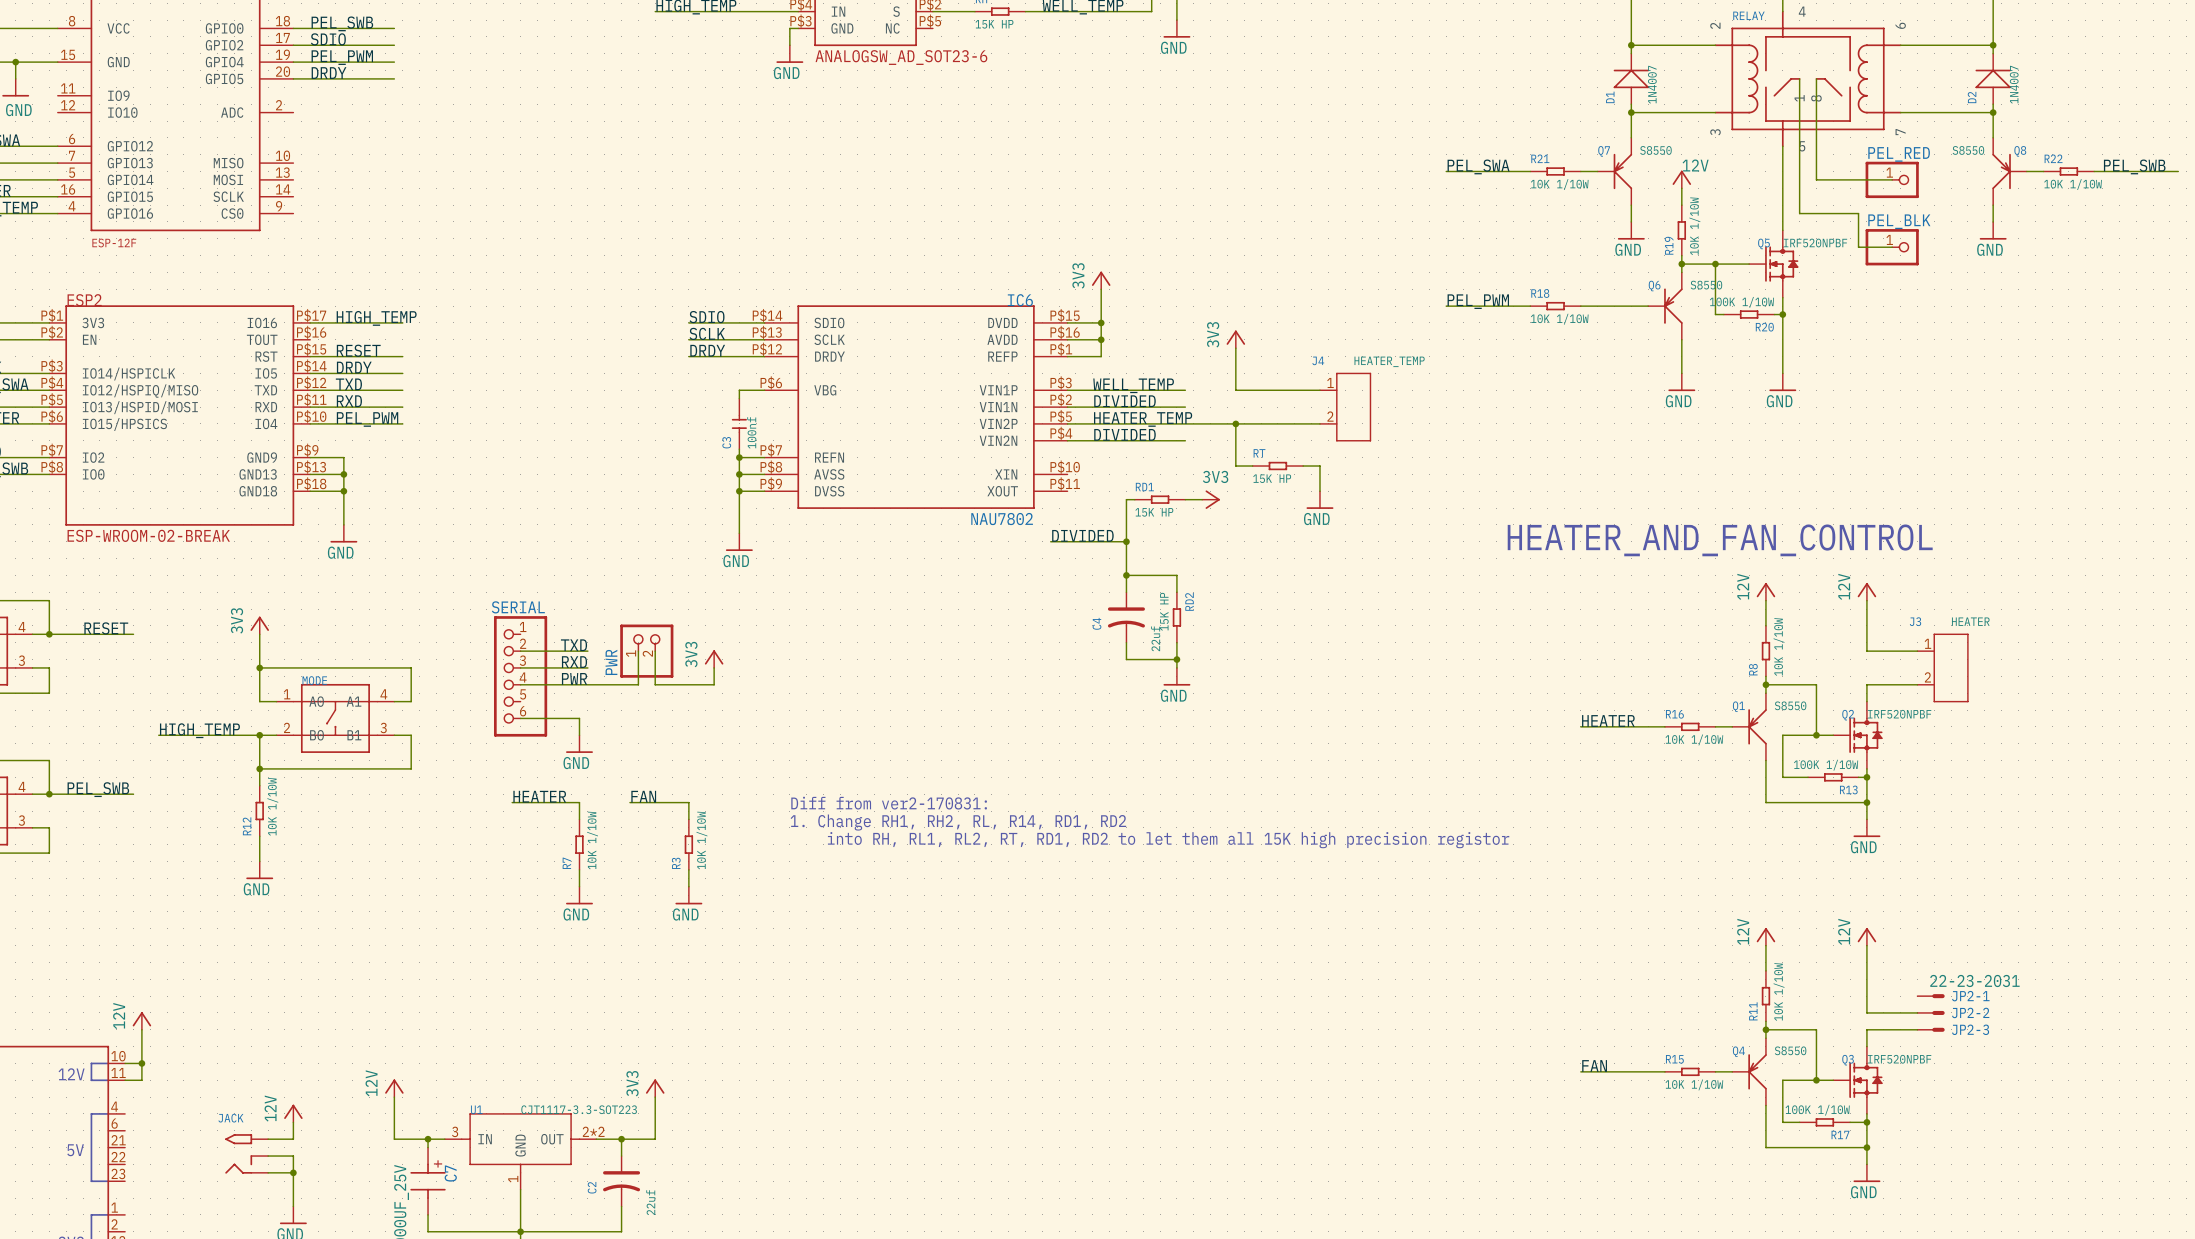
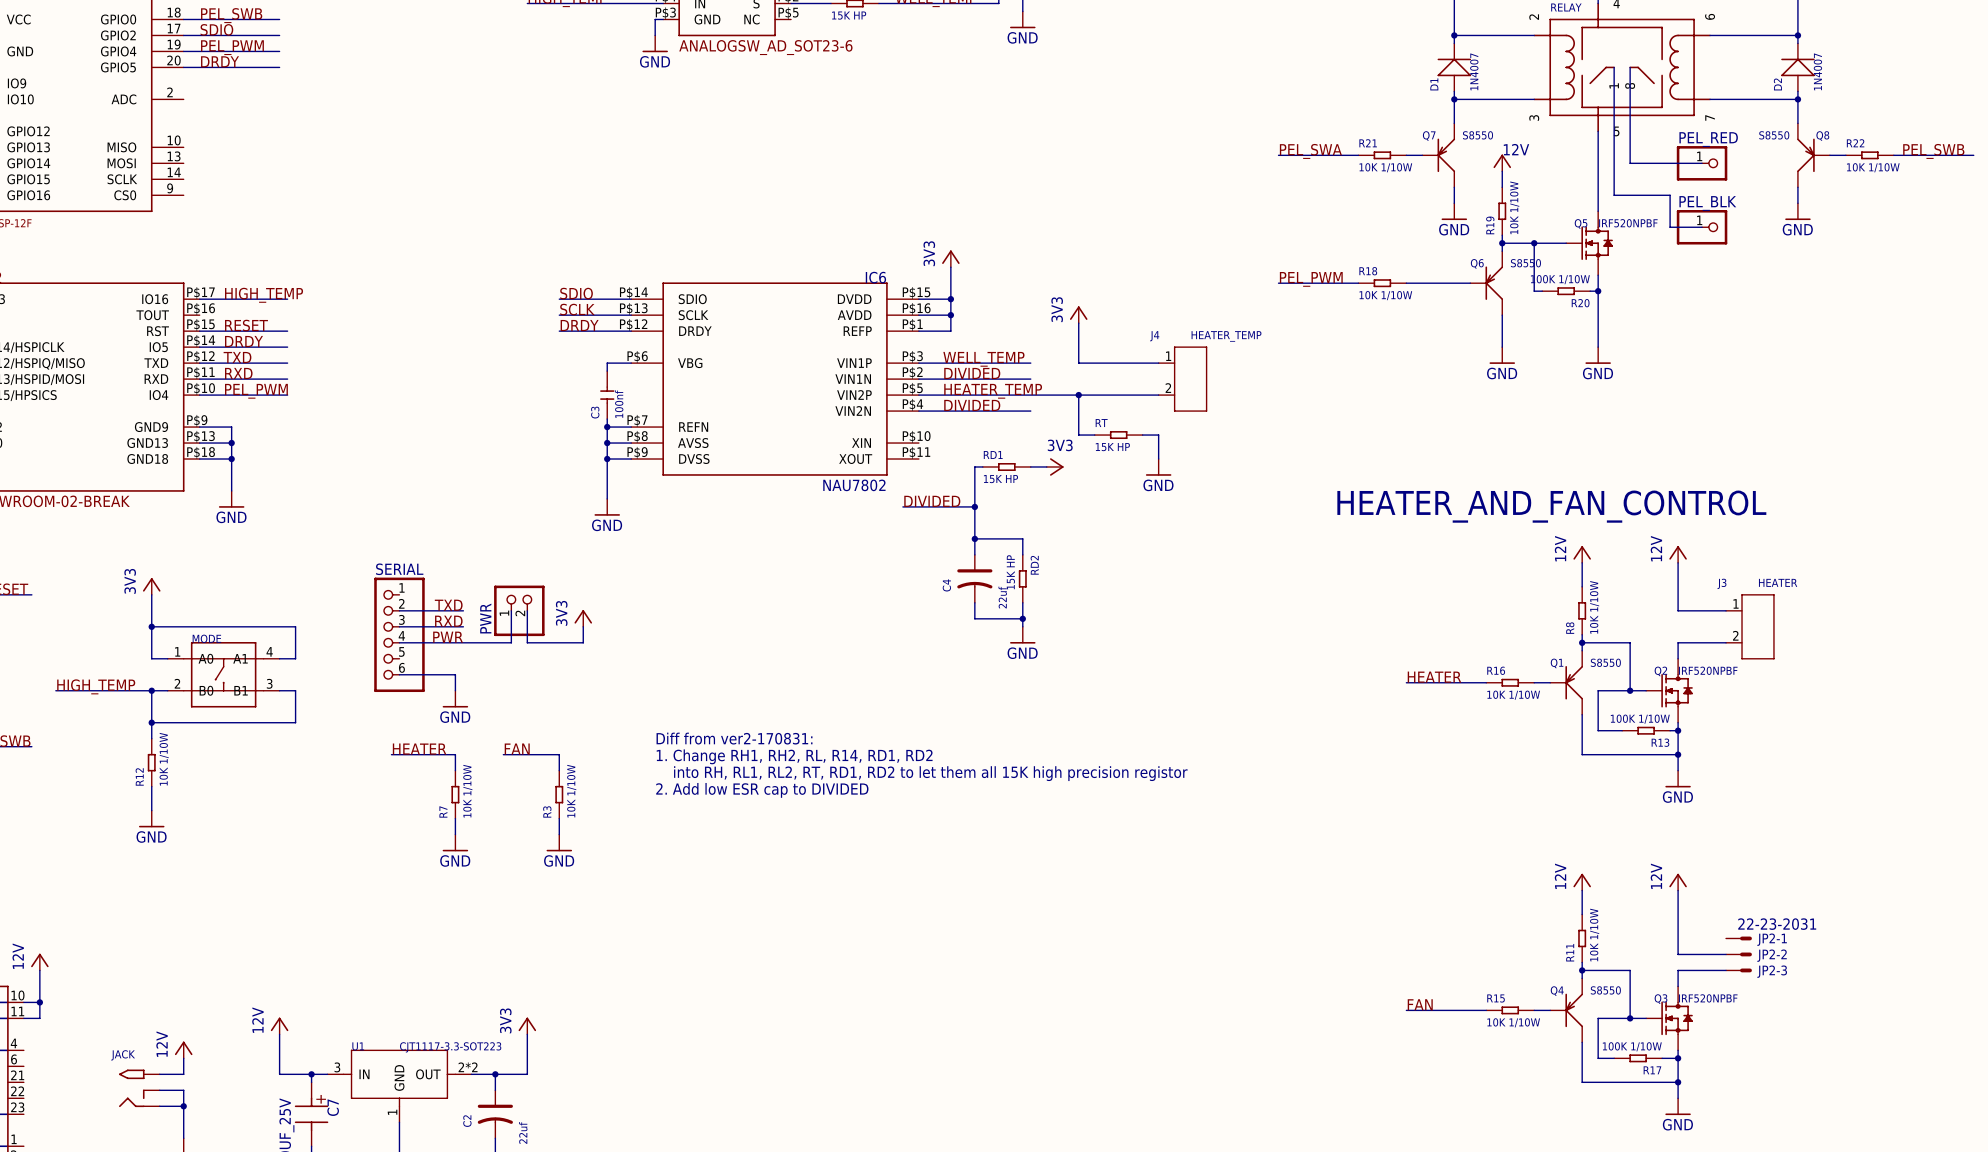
text: none -> Diff from ver2-170831: (734, 738)
text: Diff from ver2-170831: (889, 803) -> 1. Change RH1, RH2, RL, R14, RD1, RD2 (794, 756)
text: 1. Change RH1, RH2, RL, R14, RD1, RD2 (958, 822) -> into RH, RL1, RL2, RT, RD1, RD2 to let them all 15K high precision registor (930, 773)
text: into RH, RL1, RL2, RT, RD1, RD2 to let them all 15K high precision registor (1168, 840) -> 2. Add low ESR cap to DIVIDED (762, 790)

